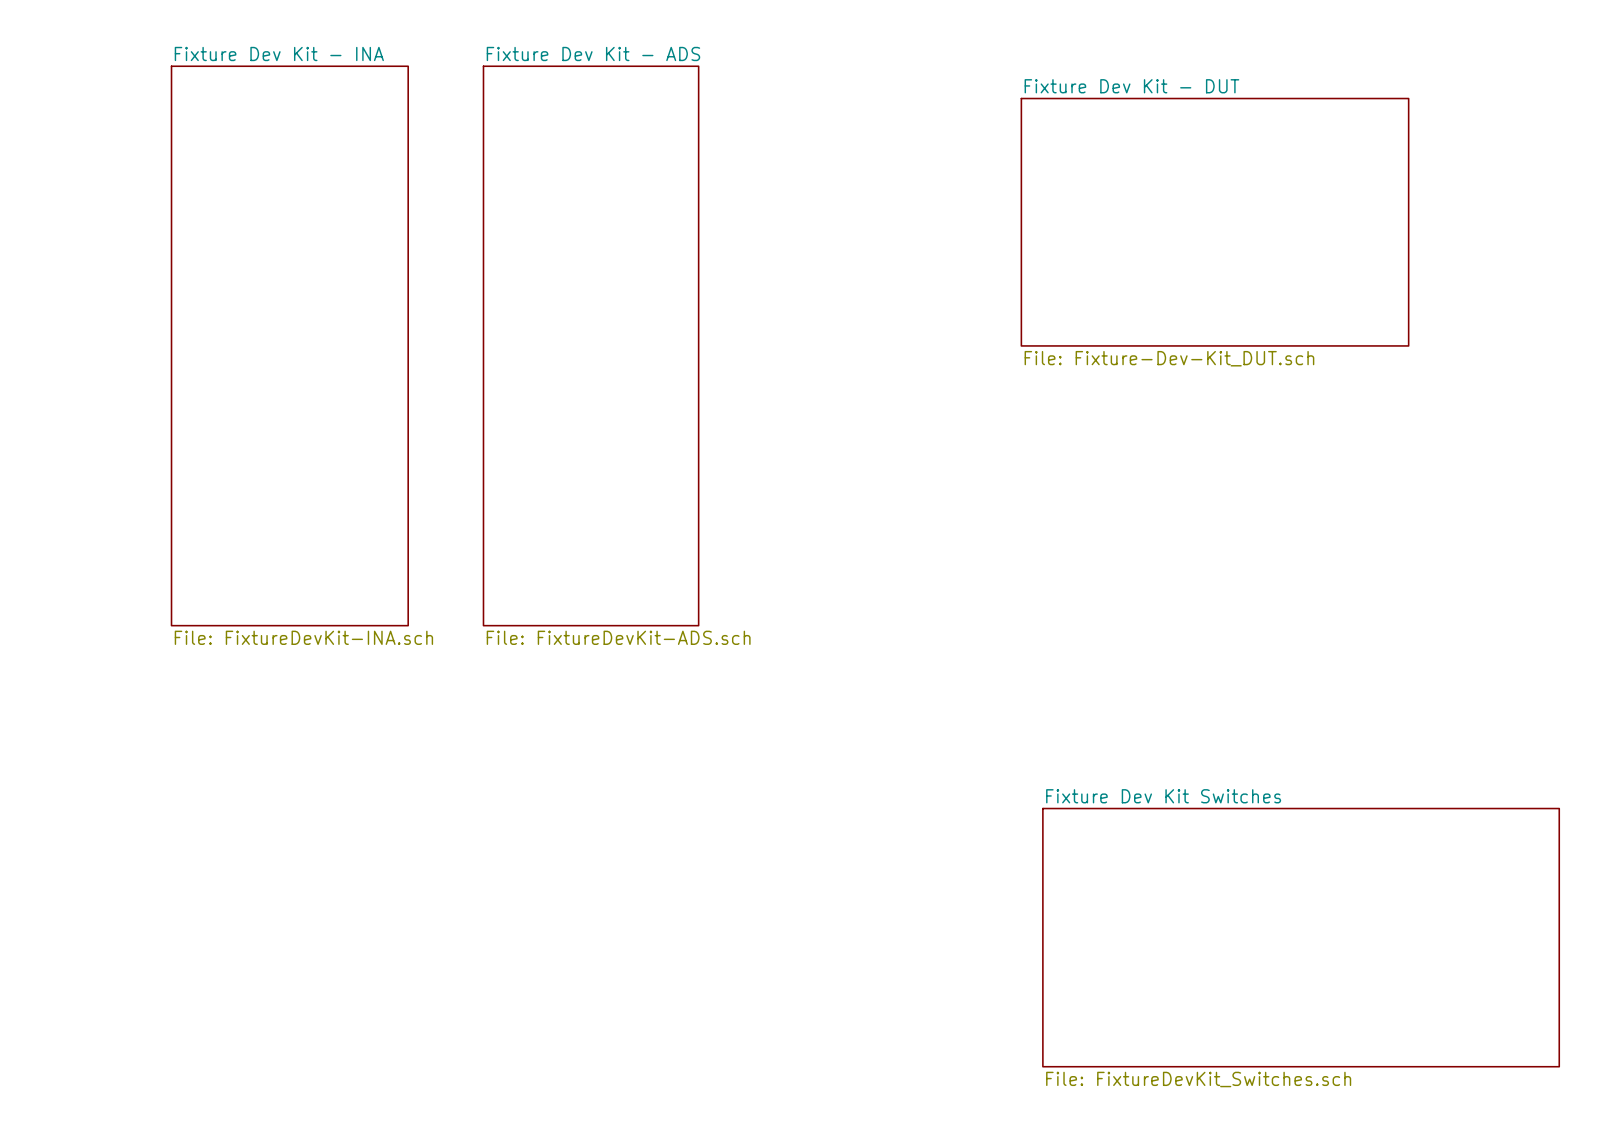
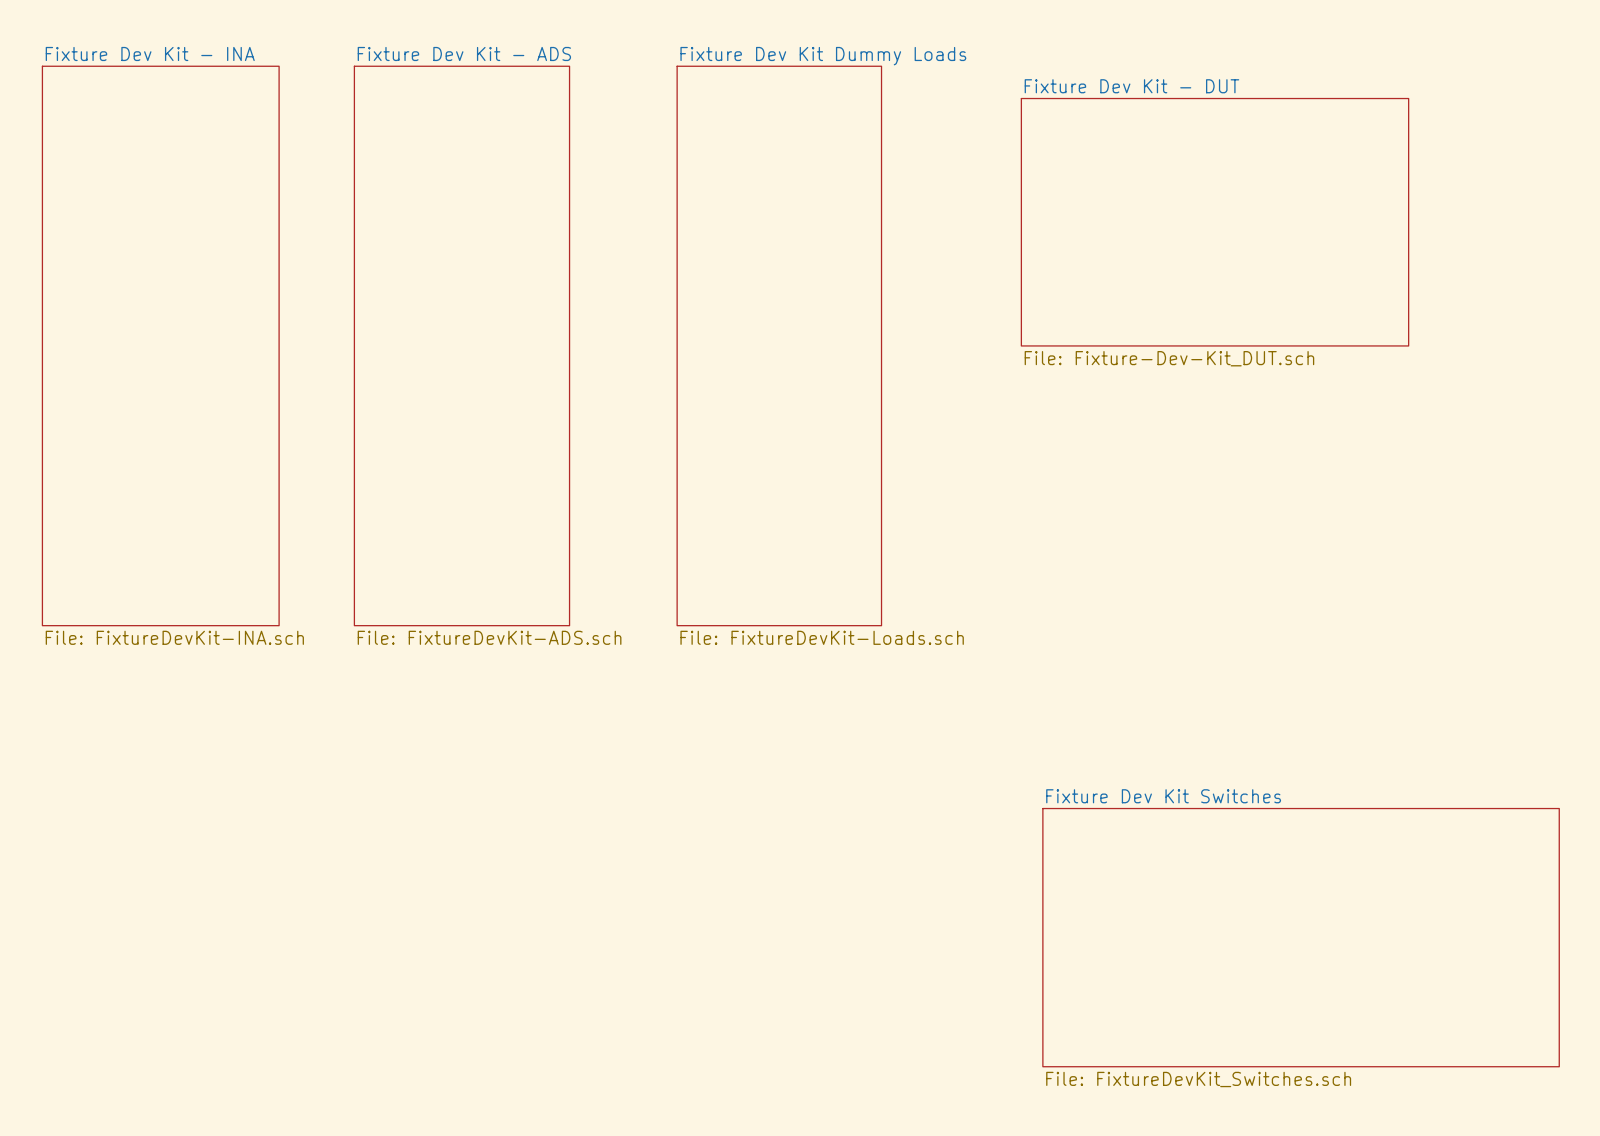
sheet Fixture Dev Kit - INA position: (289, 345) -> (160, 345)
sheet Fixture Dev Kit - ADS position: (591, 345) -> (461, 345)
sheet Fixture Dev Kit Dummy Loads: none -> File: FixtureDevKit-Loads.sch (779, 345)

